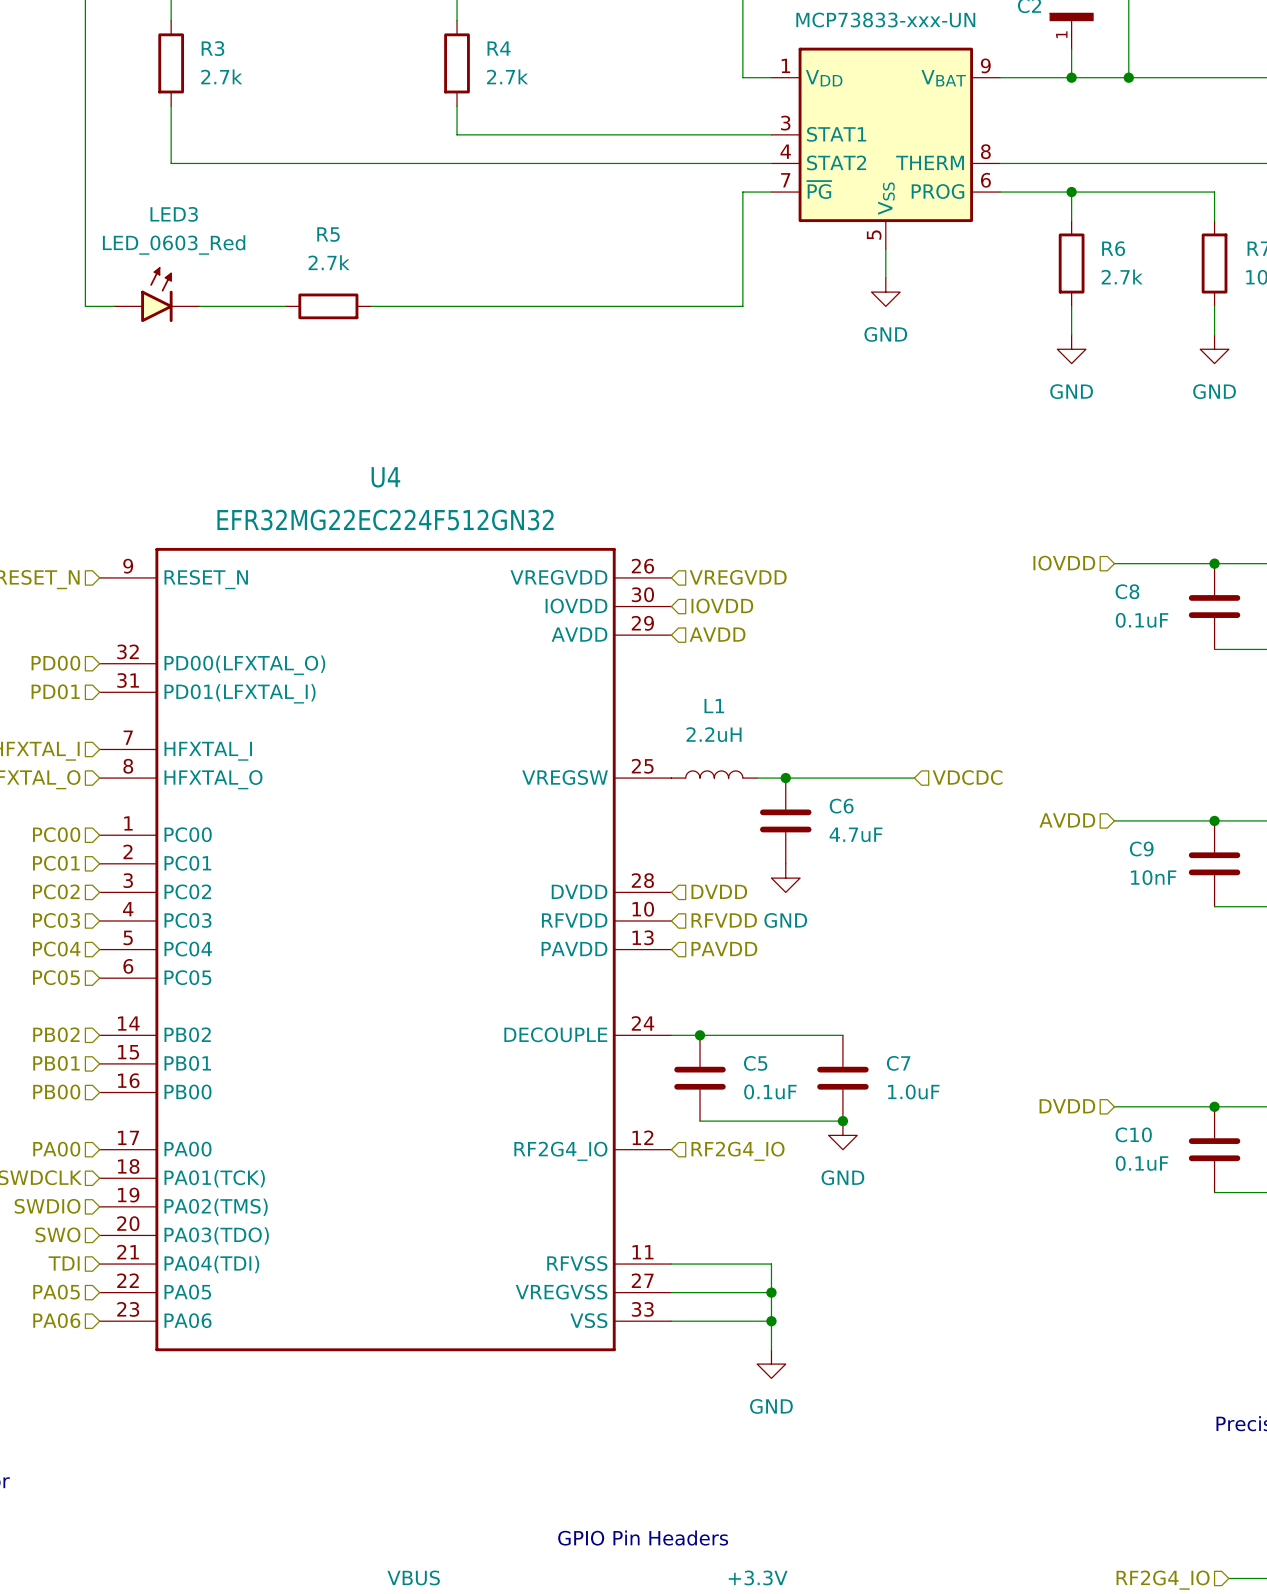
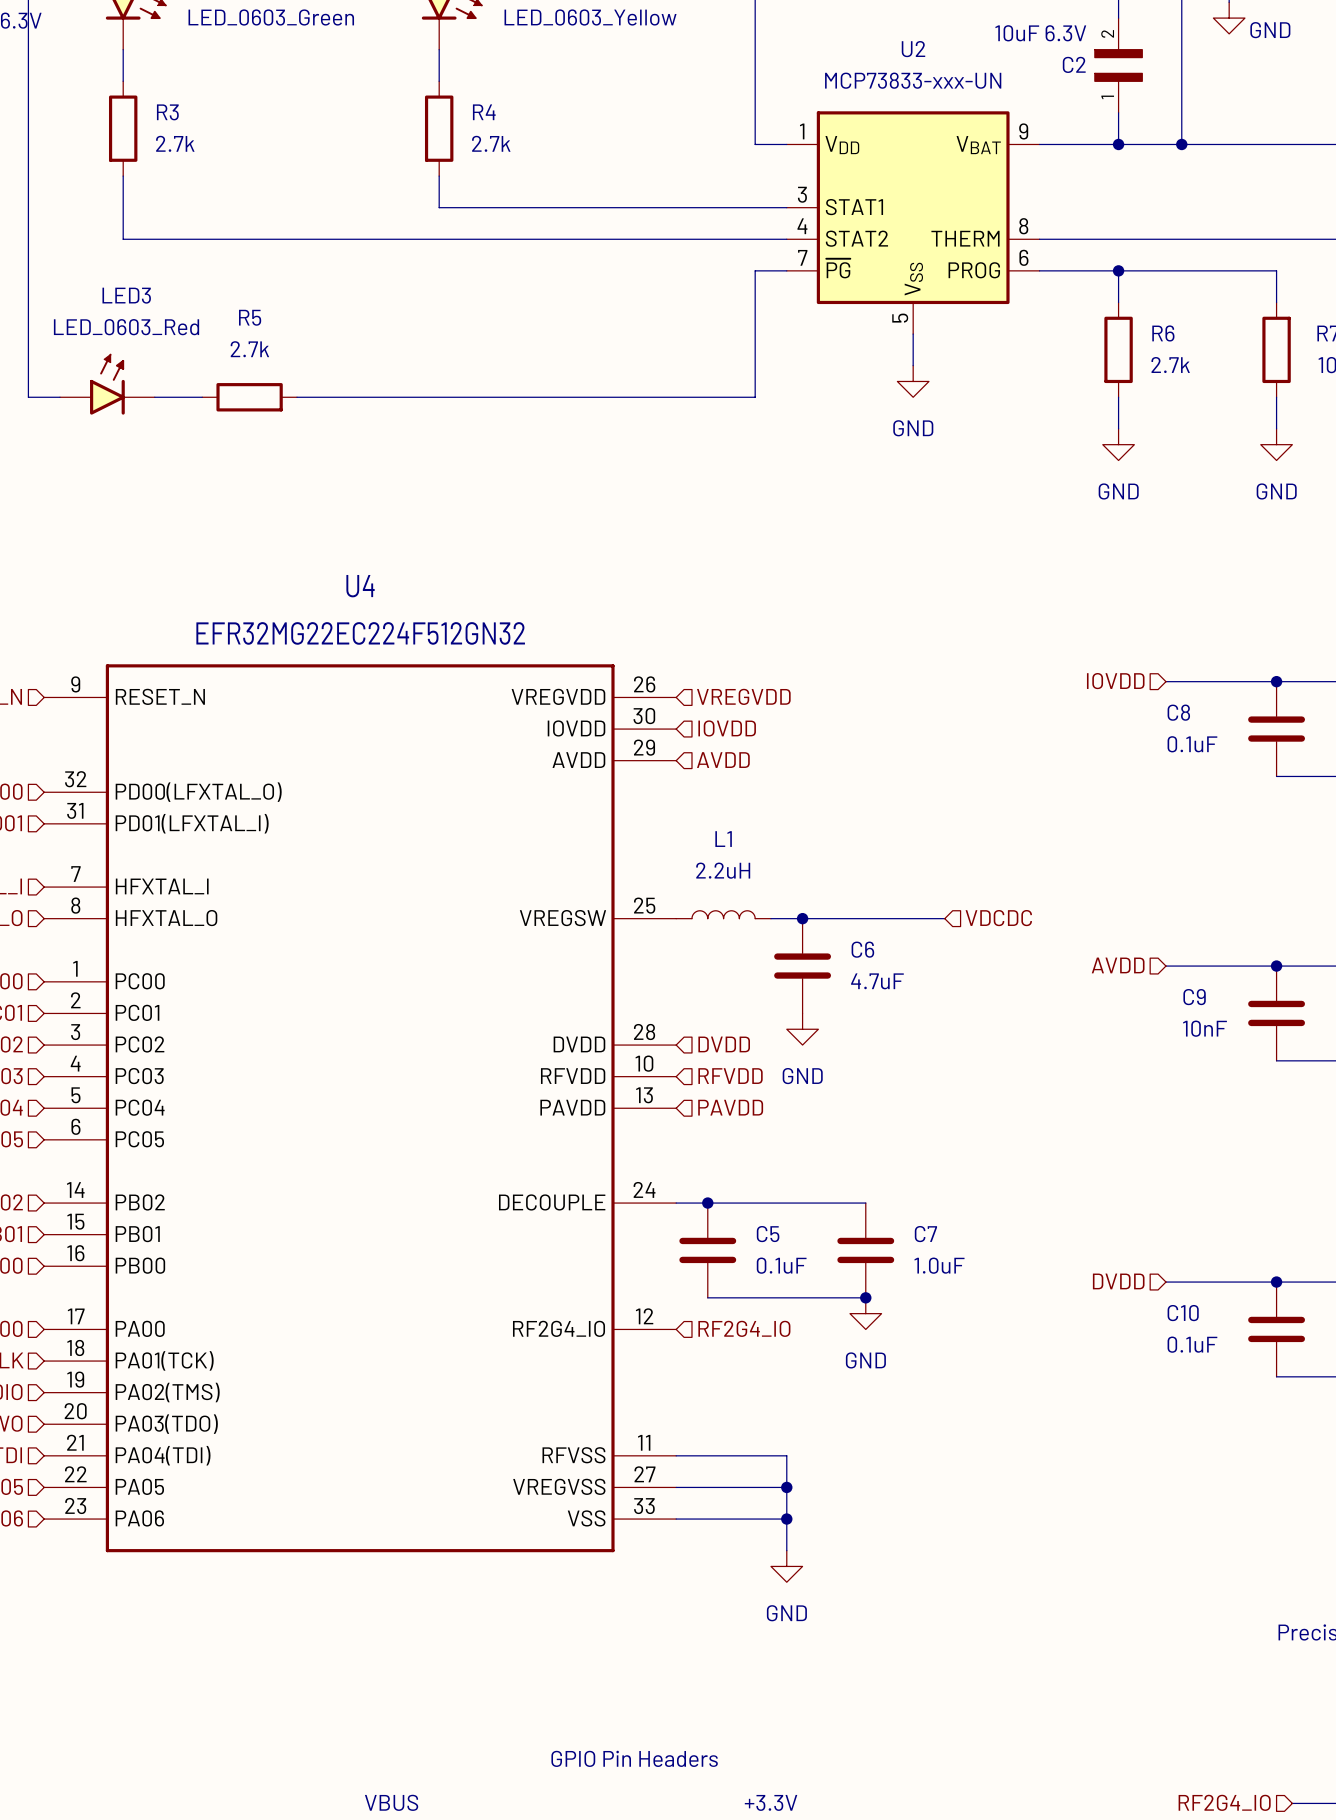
wire: (242, 306) (285, 306) -> (297, 397) (344, 397)
R5 position: (328, 306) -> (249, 397)

